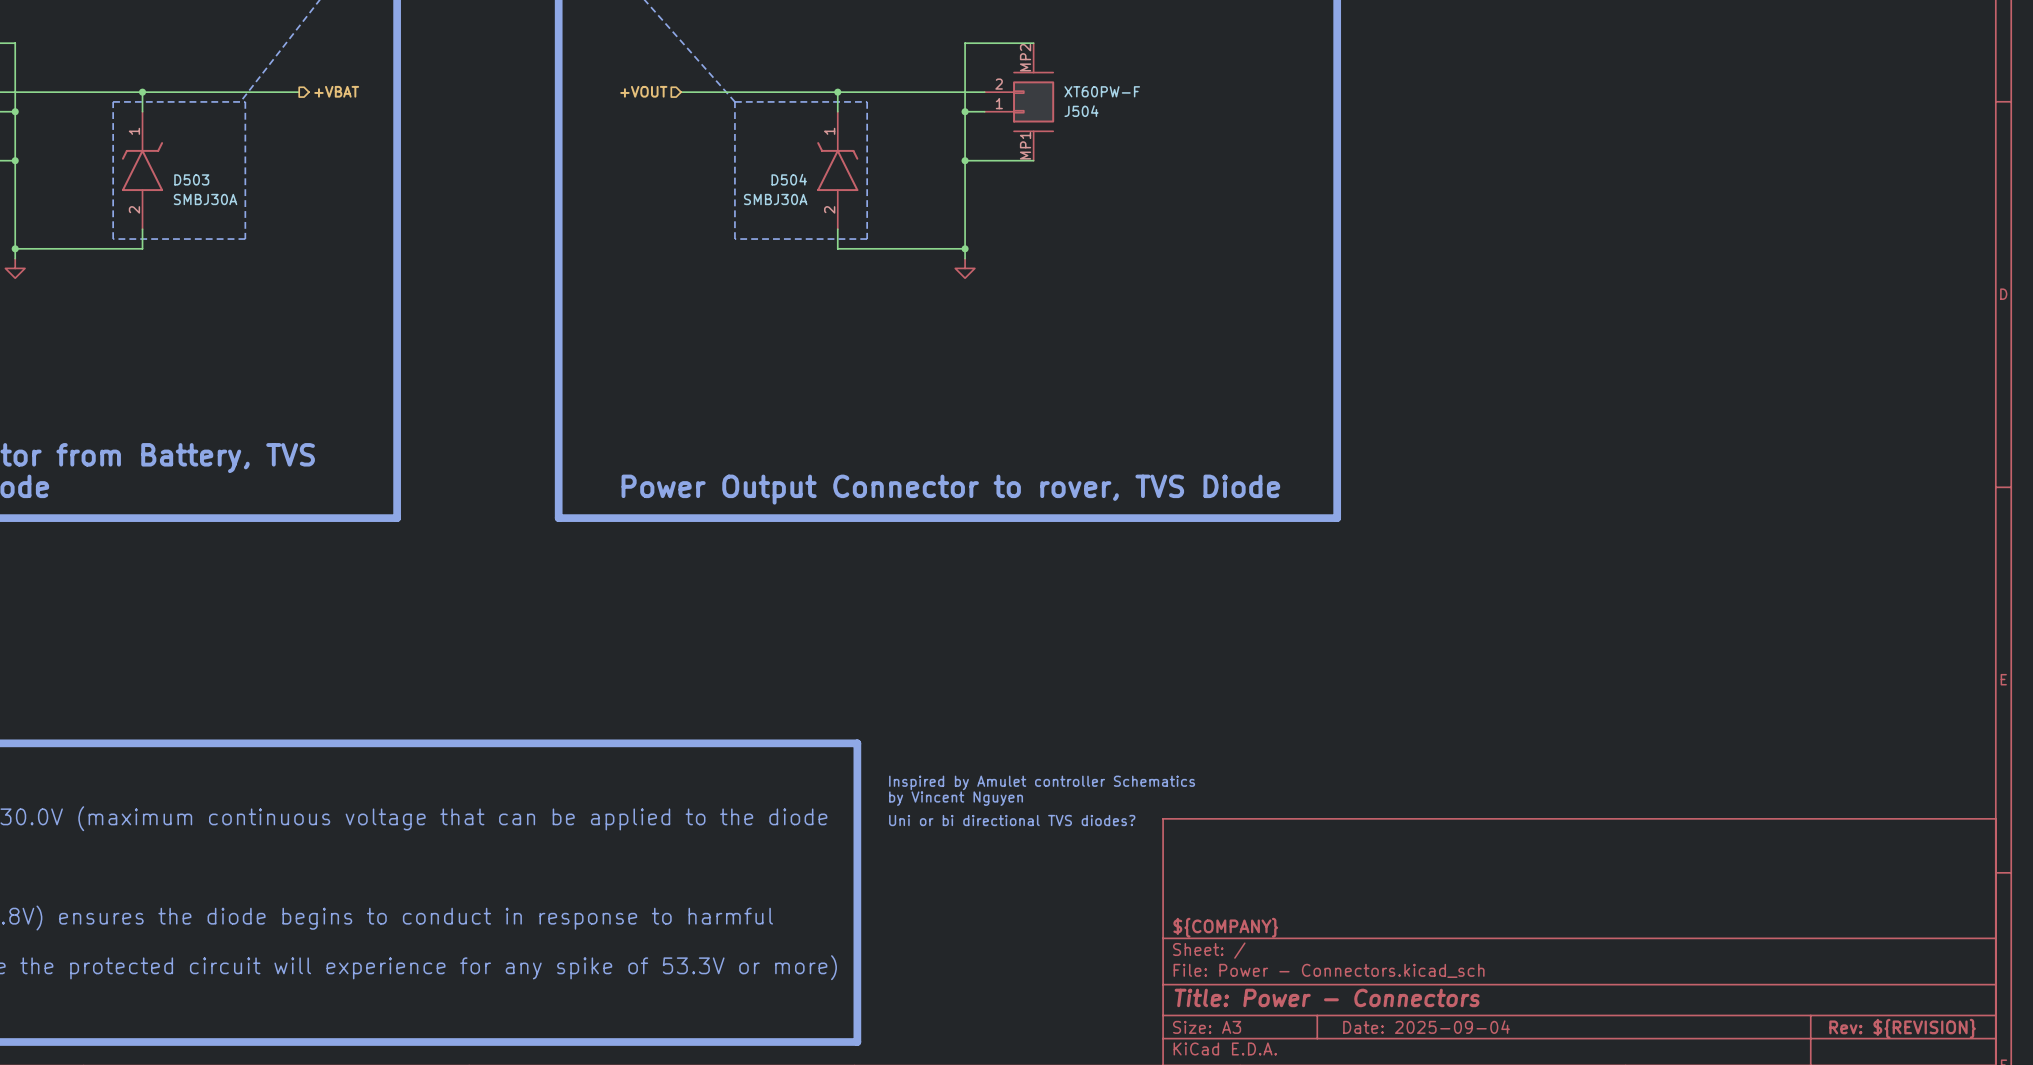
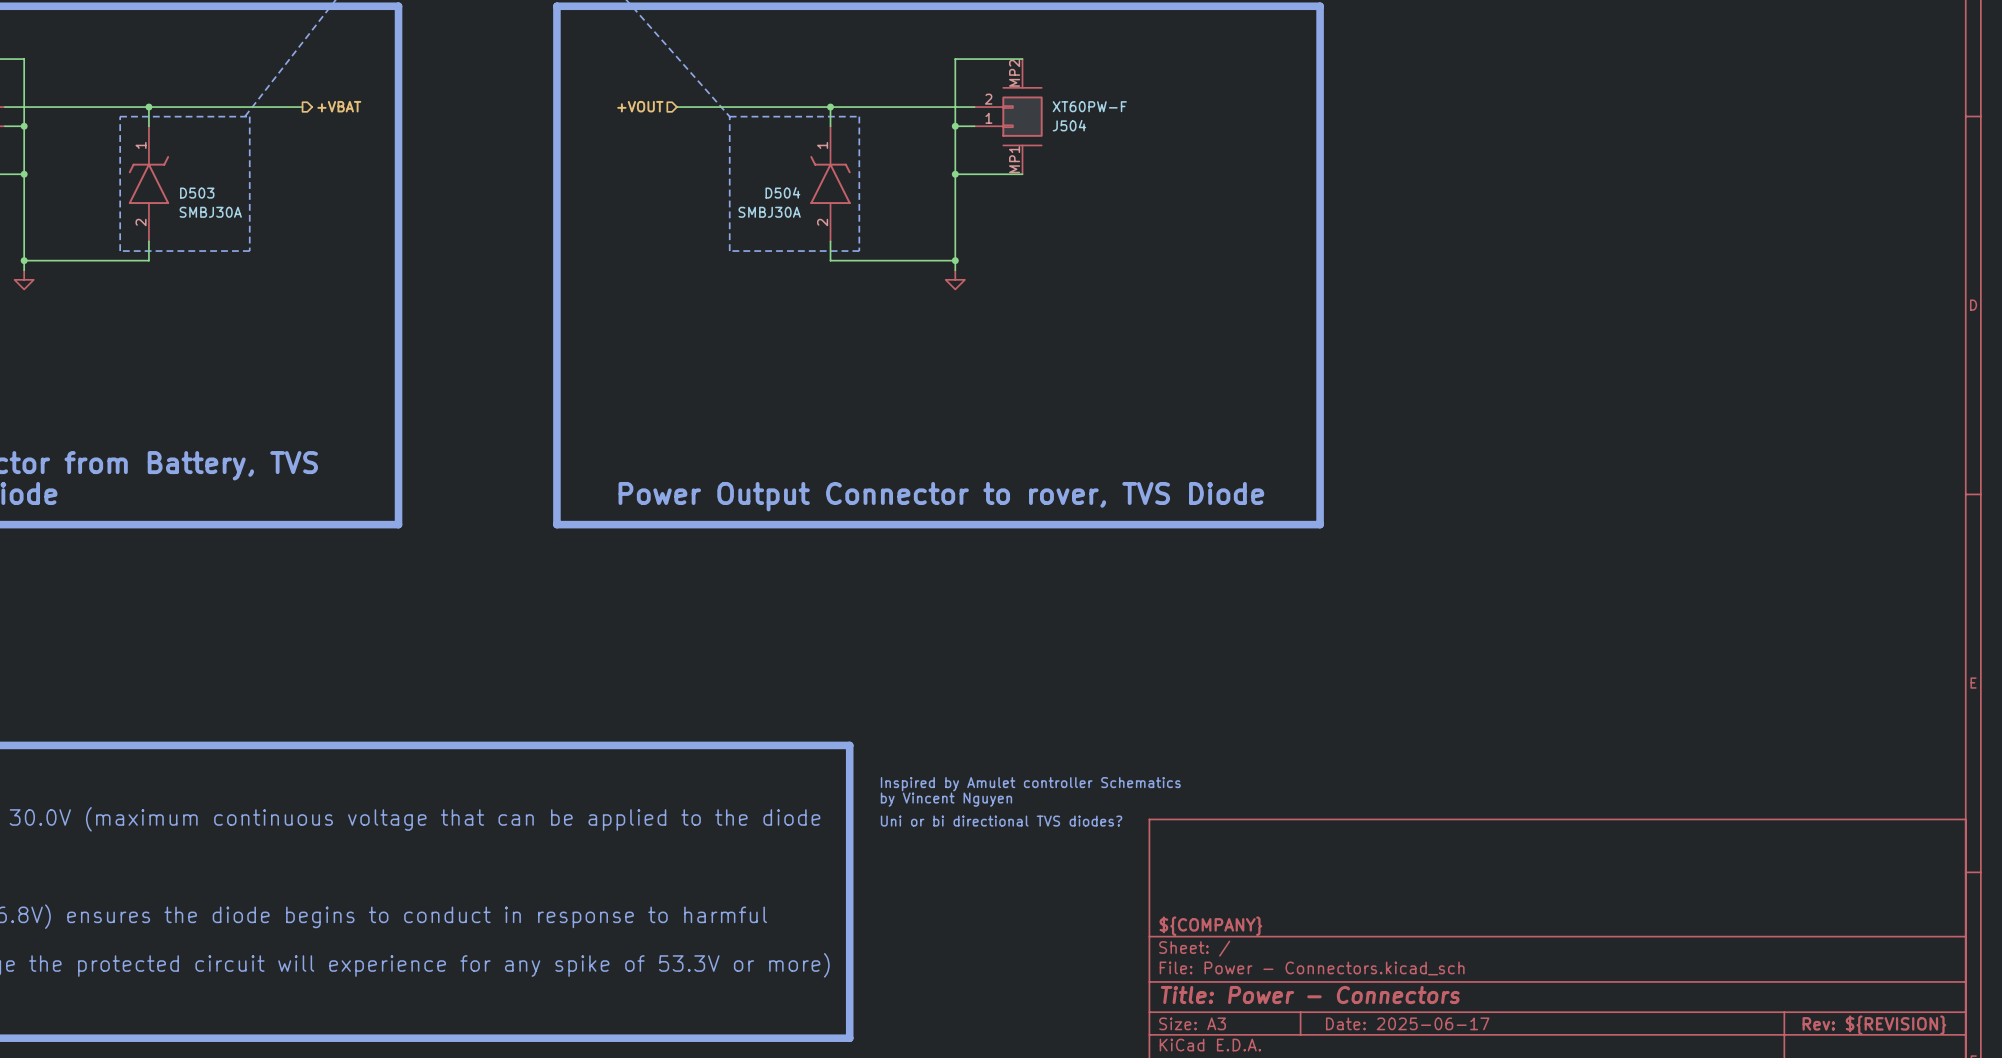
title block: Date: 2025-09-04 (1426, 1027) -> Date: 2025-06-17 (1407, 1023)

